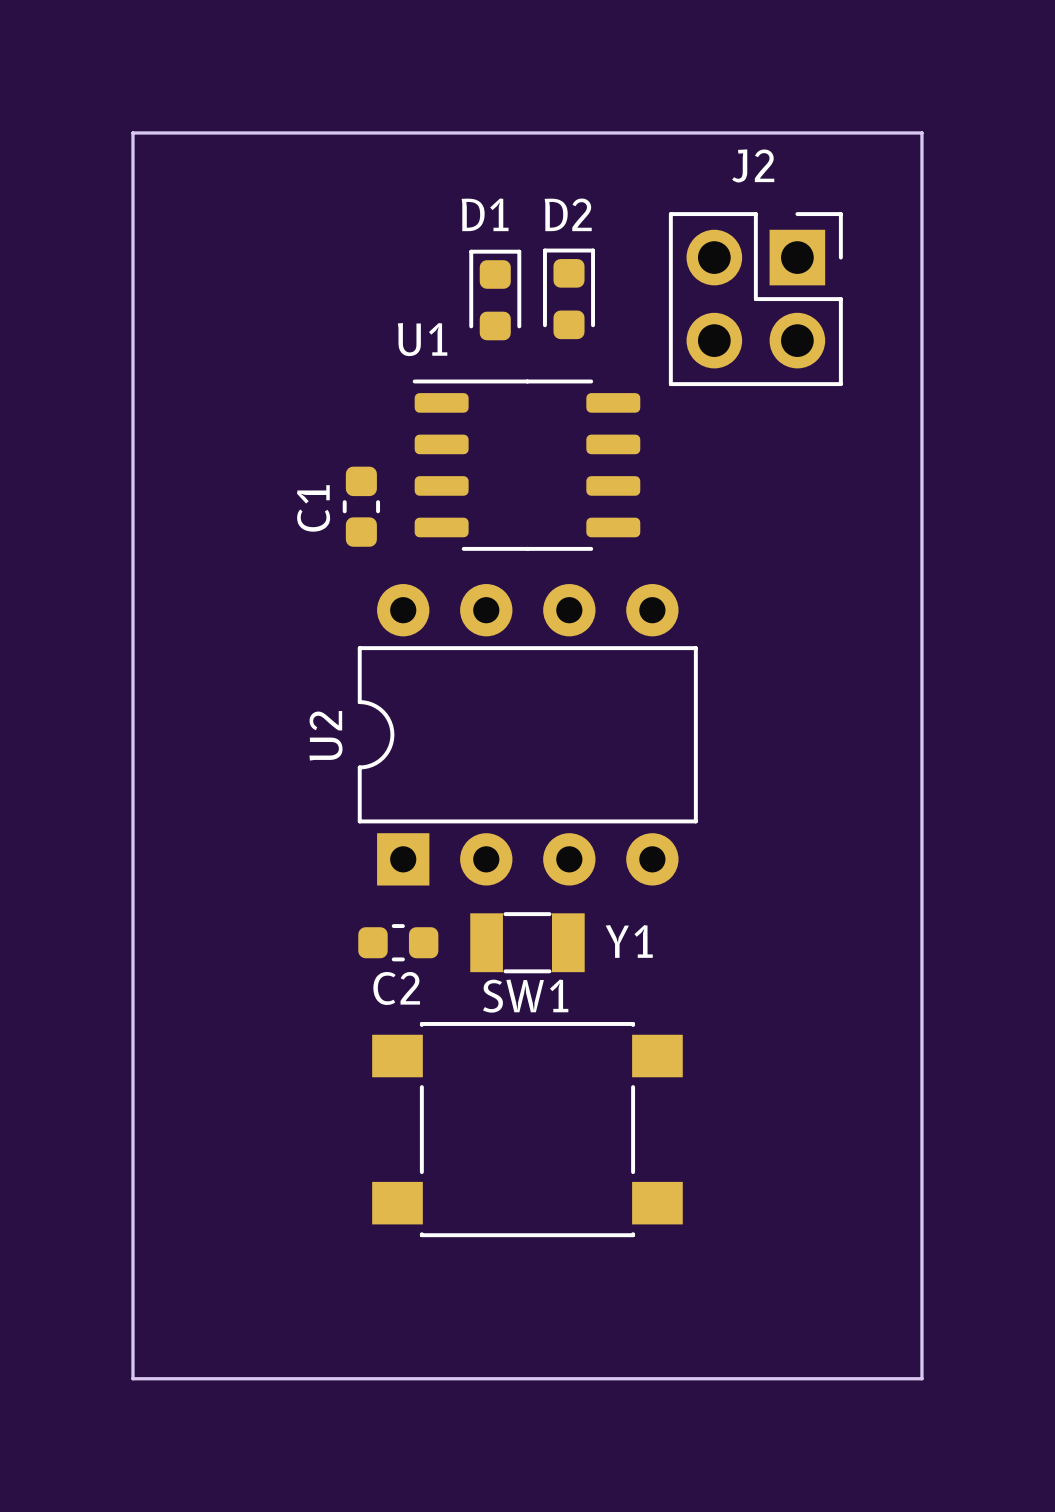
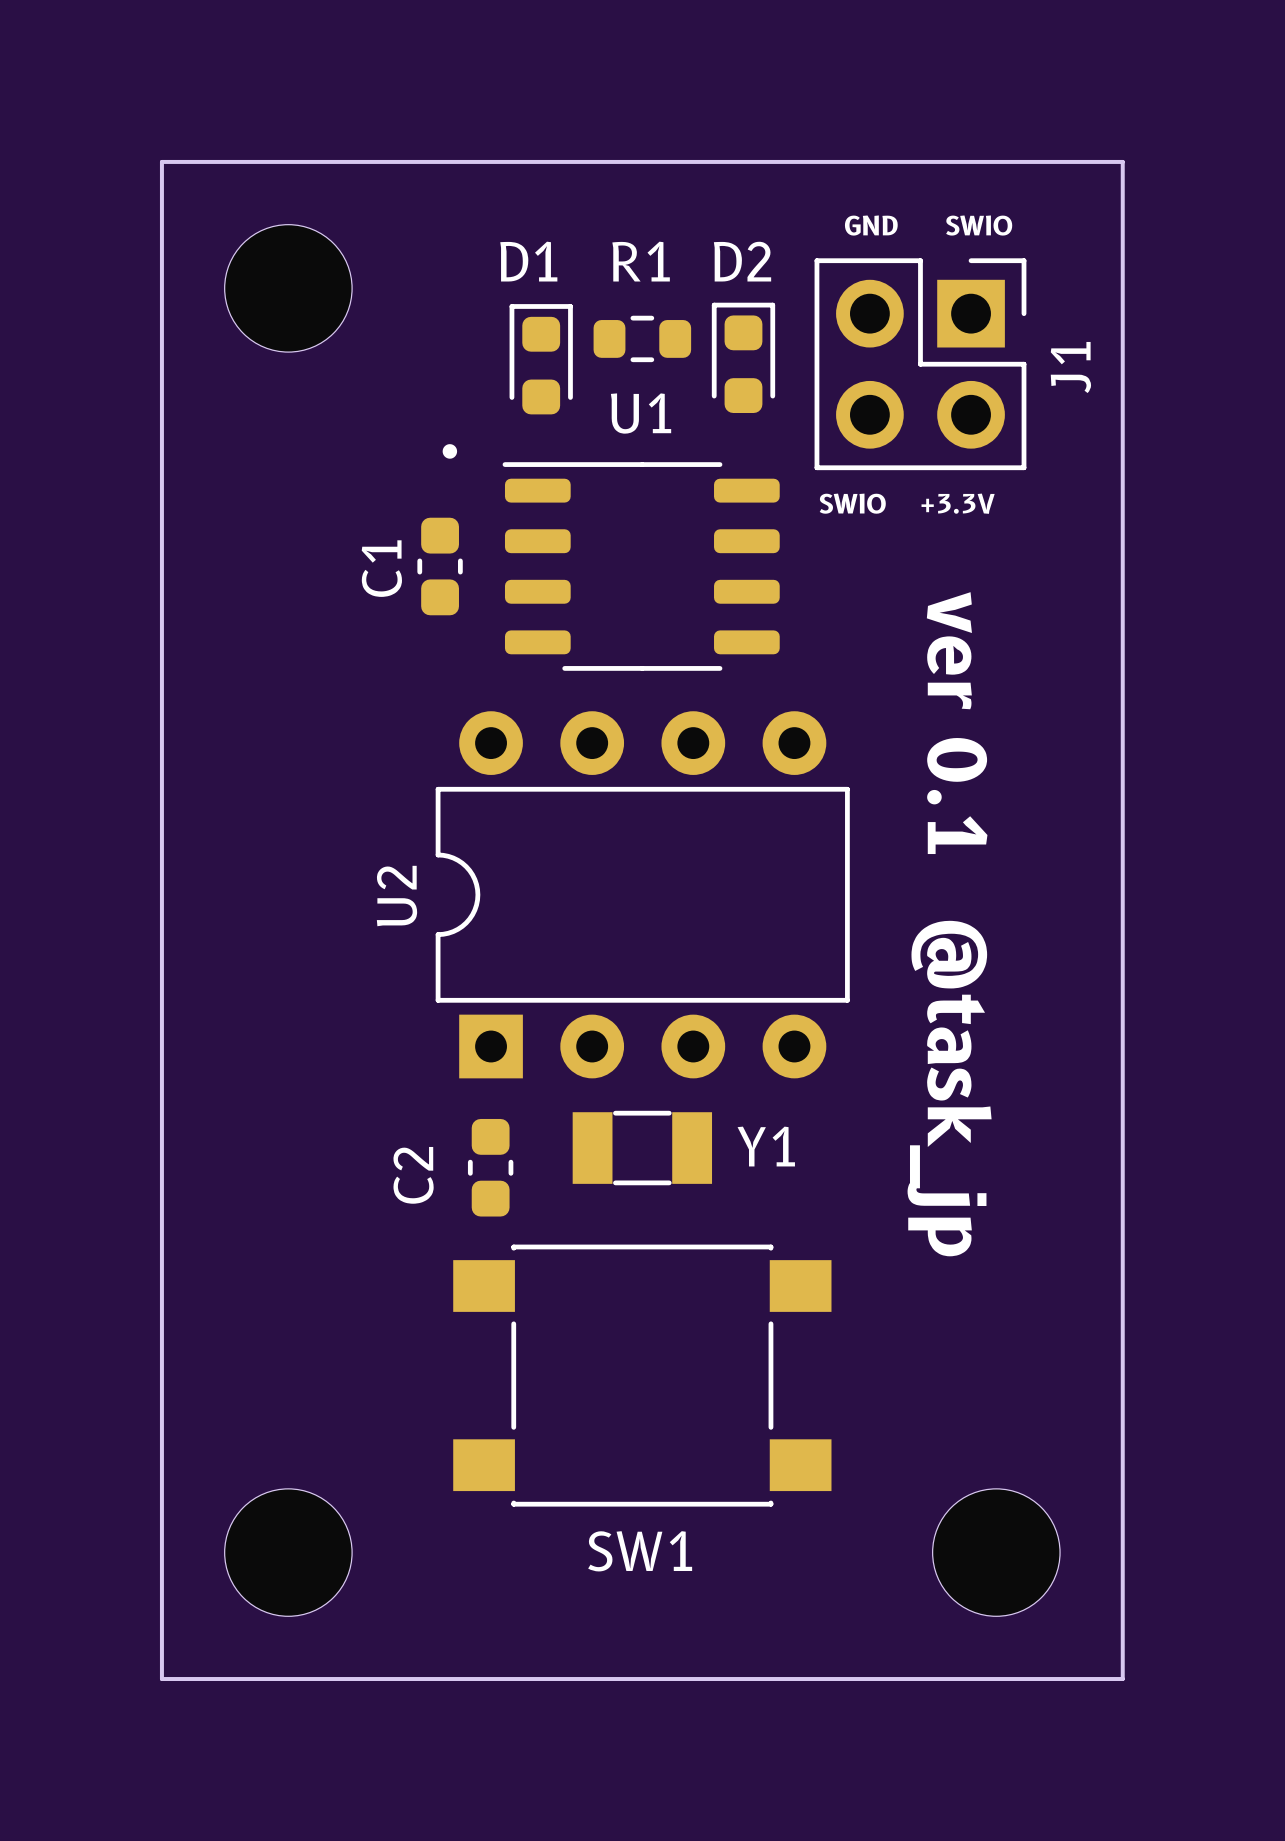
J2 name: J2 (753, 165) -> J1 (1070, 367)
text: none -> GND (871, 225)
text: none -> SWIO (979, 225)
part: none -> (288, 288)
R1: none -> (642, 338)
D2 position: (569, 293) -> (743, 357)
D1 position: (495, 295) -> (541, 359)
U1 name position: U1 (422, 339) -> U1 (641, 413)
text: none -> . (449, 451)
text: none -> SWIO (852, 503)
text: none -> +3.3V (958, 503)
C1 position: (361, 506) -> (440, 566)
text: none -> ver 0.1 @task_jp (949, 924)
C2 rotation: 0° (398, 942) -> 90° clockwise (490, 1167)
SW1 name position: SW1 (525, 996) -> SW1 (640, 1551)
part: none -> (288, 1552)
part: none -> (996, 1552)

